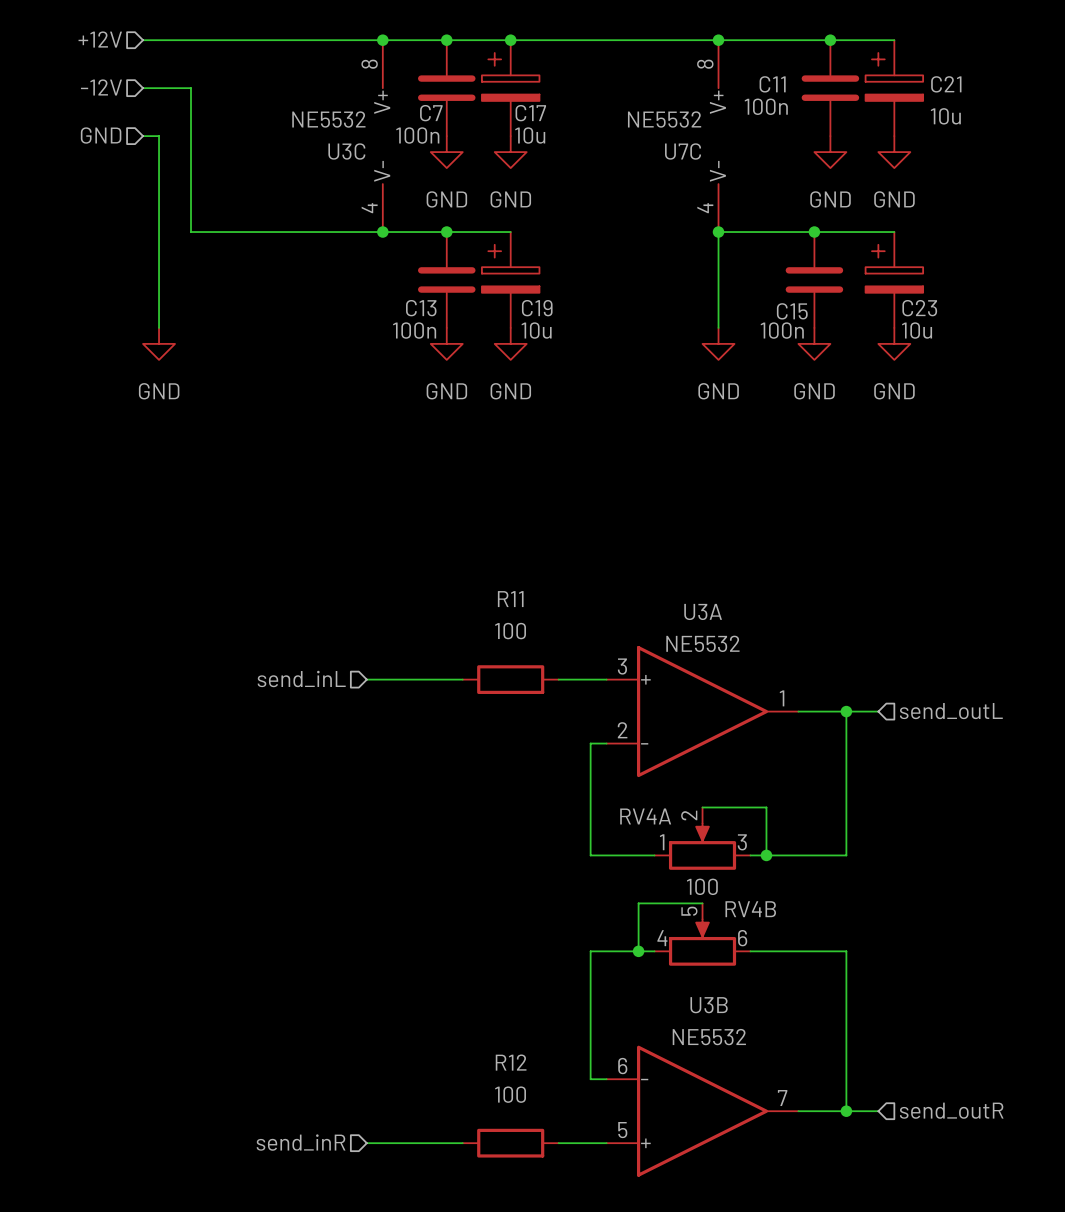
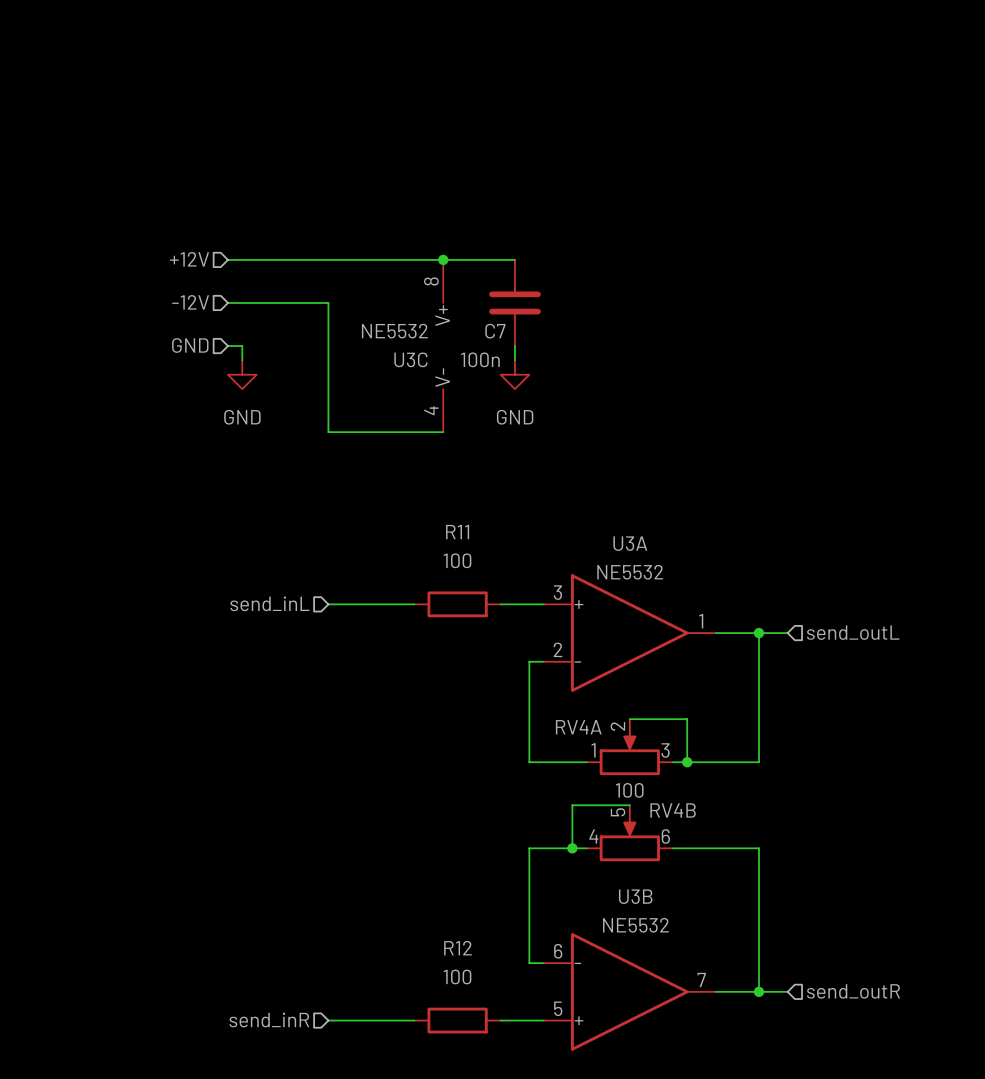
hierarchical label position: +12V (100, 39) -> +12V (189, 259)
wire: (143, 40) (894, 40) -> none
junction: (382, 40) -> none
junction: (446, 40) -> none
junction: (510, 40) -> none
junction: (718, 40) -> none
junction: (830, 40) -> none
hierarchical label position: -12V (101, 87) -> -12V (190, 302)
wire: (143, 88) (191, 88) (191, 232) (510, 232) -> none
C7 position: (446, 88) -> (515, 302)
C17: 10u (510, 88) -> none
C11: 100n (830, 88) -> none
C21: 10u (894, 88) -> none
C7 name position: C7 (431, 113) -> C7 (495, 331)
hierarchical label position: GND (101, 135) -> GND (190, 345)
C7 value position: 100n (417, 135) -> 100n (480, 359)
wire: (143, 136) (159, 136) (159, 327) -> none
U3C position: (382, 136) -> (443, 346)
U7C: NE5532 (718, 136) -> none
power symbol: GND (446, 152) -> none
power symbol: GND (510, 152) -> none
power symbol: GND (830, 152) -> none
power symbol: GND (894, 152) -> none
junction: (382, 232) -> none
junction: (446, 232) -> none
junction: (718, 232) -> none
junction: (814, 232) -> none
wire: (894, 232) (718, 232) (718, 327) -> none
C13: 100n (446, 279) -> none
C19: 10u (510, 279) -> none
C15: 100n (814, 279) -> none
C23: 10u (894, 279) -> none
wire: none -> (227, 259) (515, 259)
junction: none -> (443, 259)
power symbol: GND (159, 343) -> none
wire: none -> (227, 302) (328, 302) (328, 432) (443, 432)
power symbol: GND (446, 343) -> none
power symbol: GND (510, 343) -> none
power symbol: GND (718, 343) -> none
power symbol: GND (814, 343) -> none
power symbol: GND (894, 343) -> none
wire: none -> (227, 346) (242, 346) (242, 360)
wire: none -> (515, 346) (515, 360)
power symbol: none -> GND (242, 374)
power symbol: none -> GND (515, 374)

